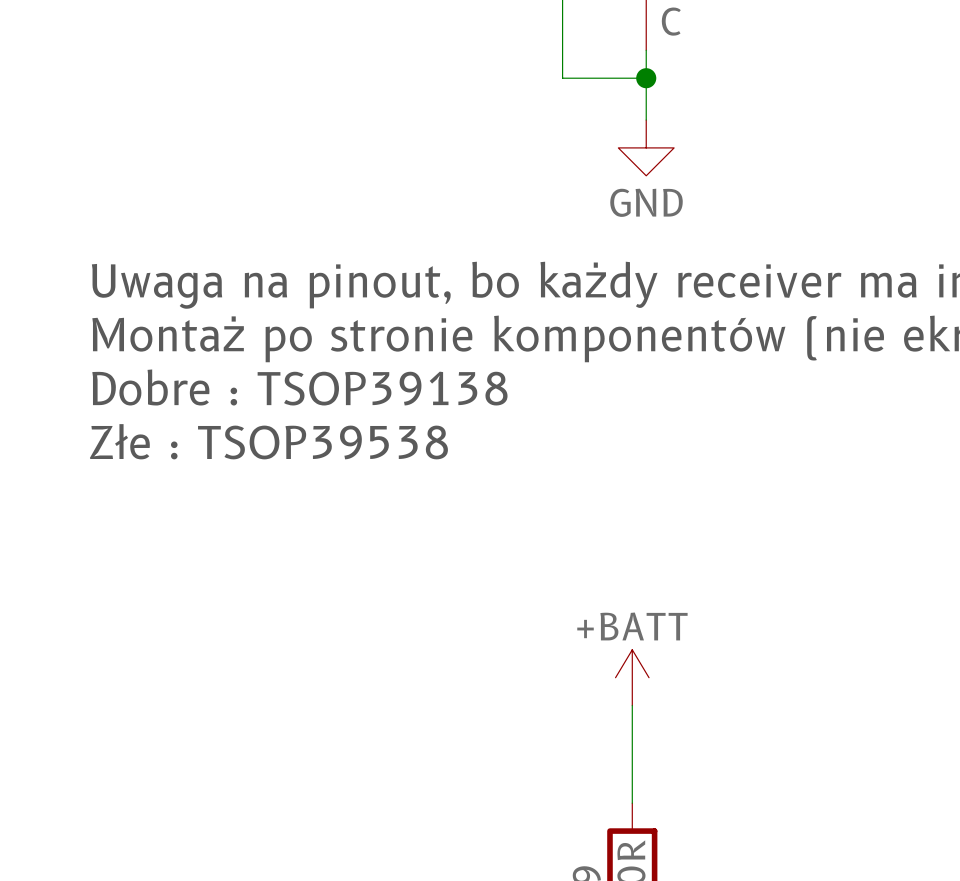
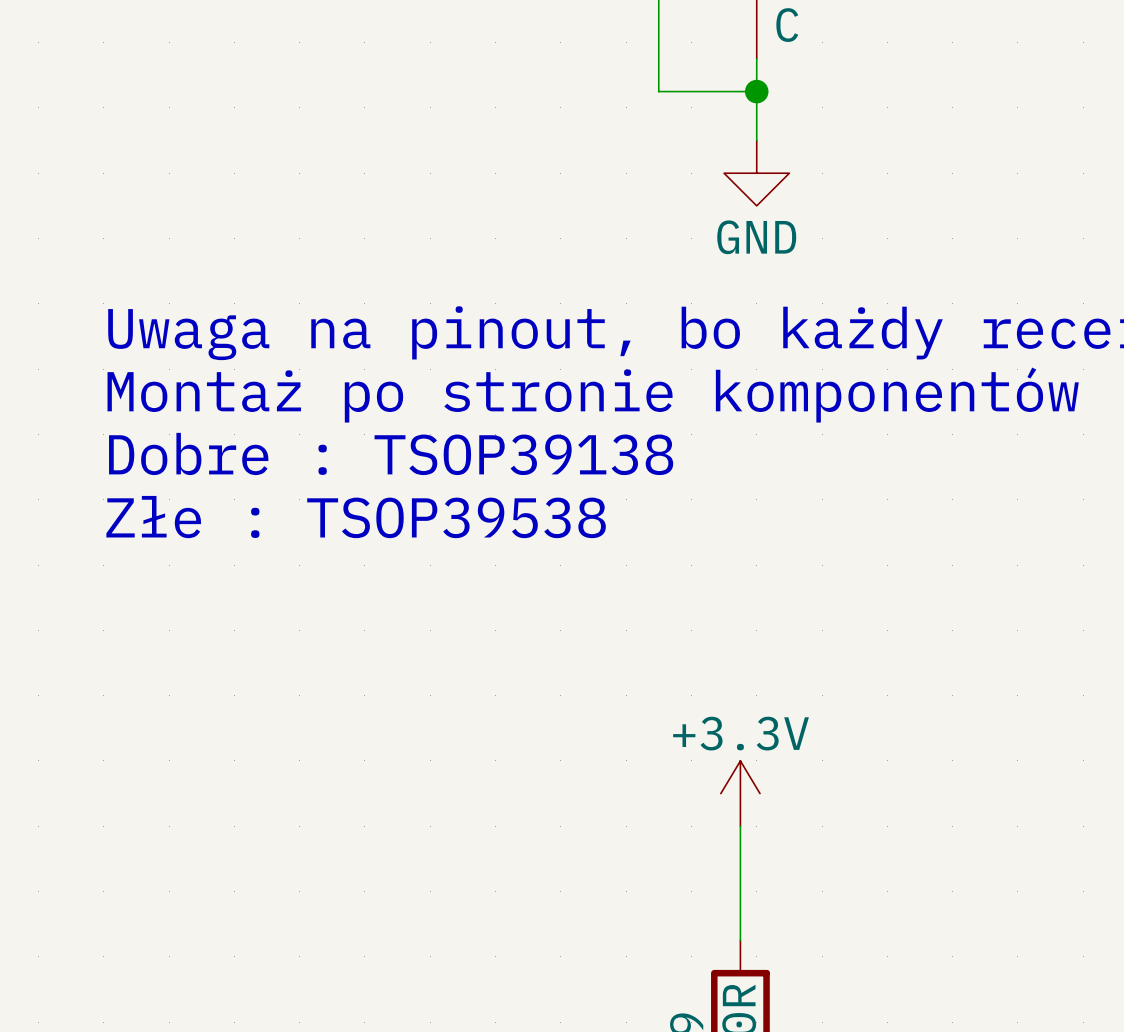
power symbol: +BATT (632, 677) -> +3.3V (740, 793)

